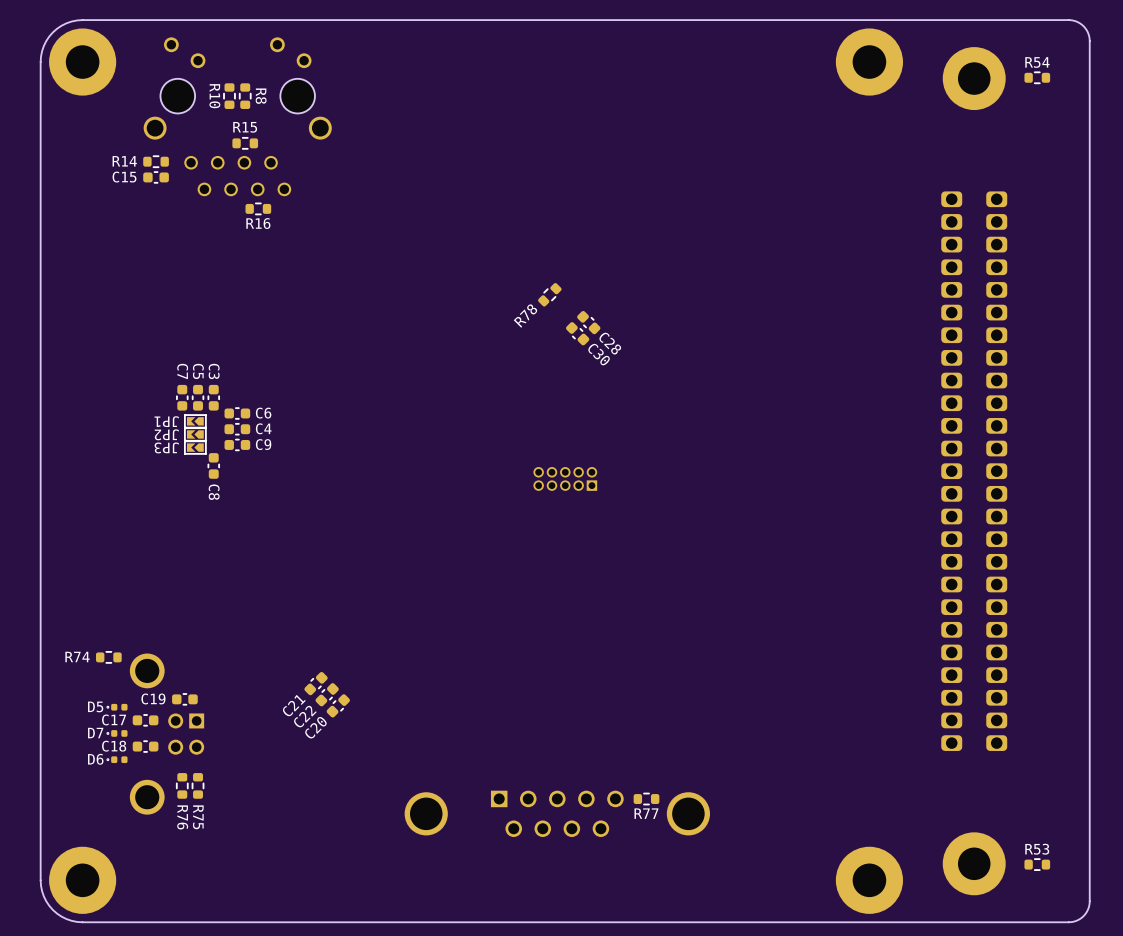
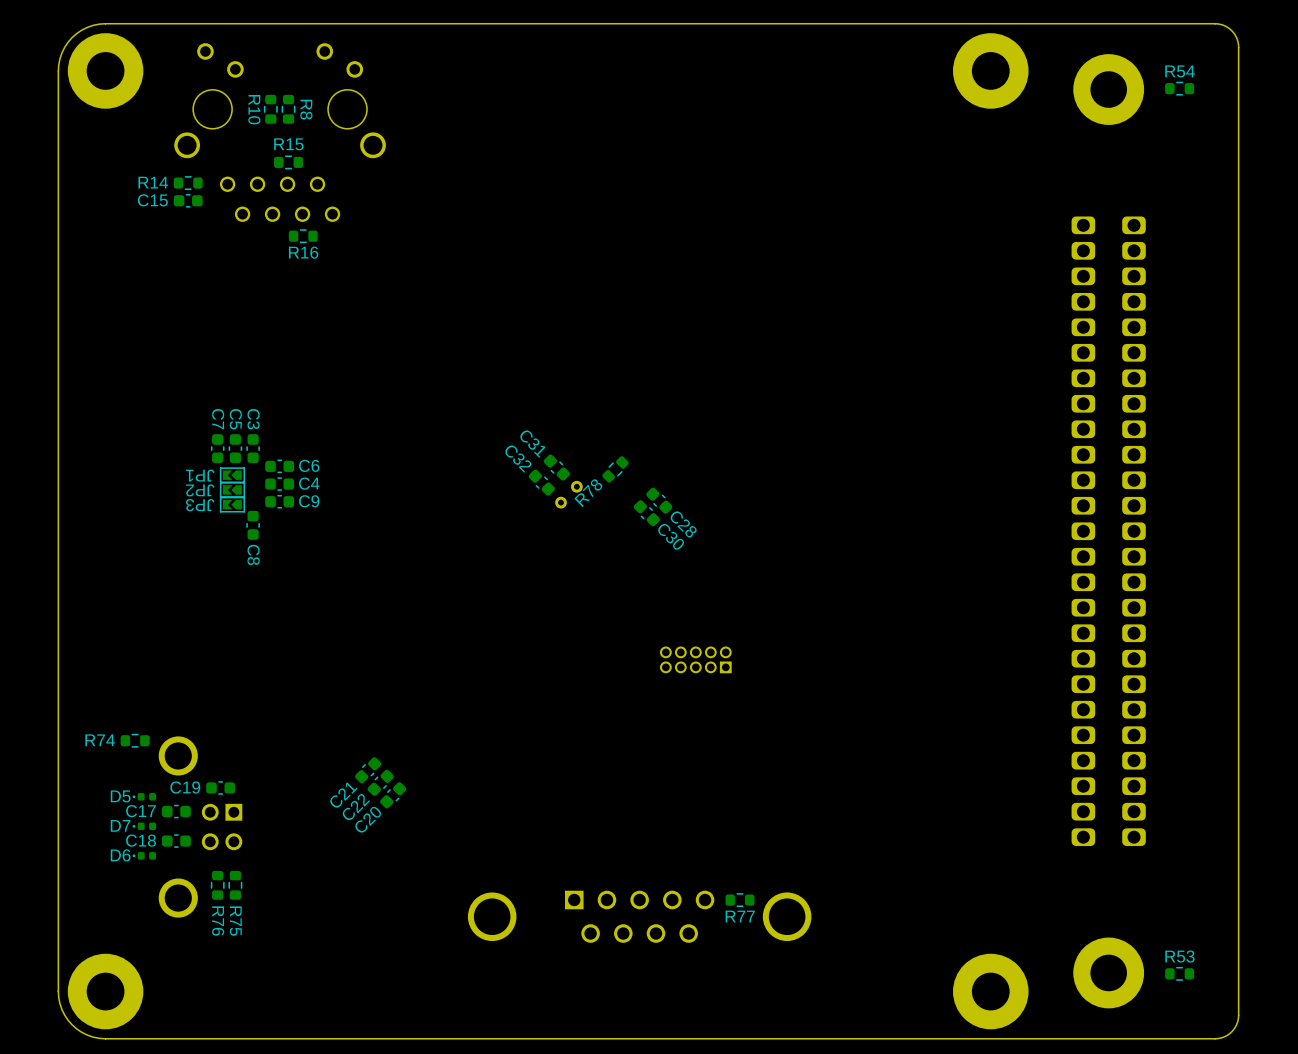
R78 position: (549, 294) -> (615, 469)
C28 position: (588, 322) -> (659, 500)
C30 position: (577, 333) -> (646, 513)
C31: none -> (556, 467)
C32: none -> (541, 482)
part: none -> (568, 494)
part position: (565, 478) -> (695, 659)

